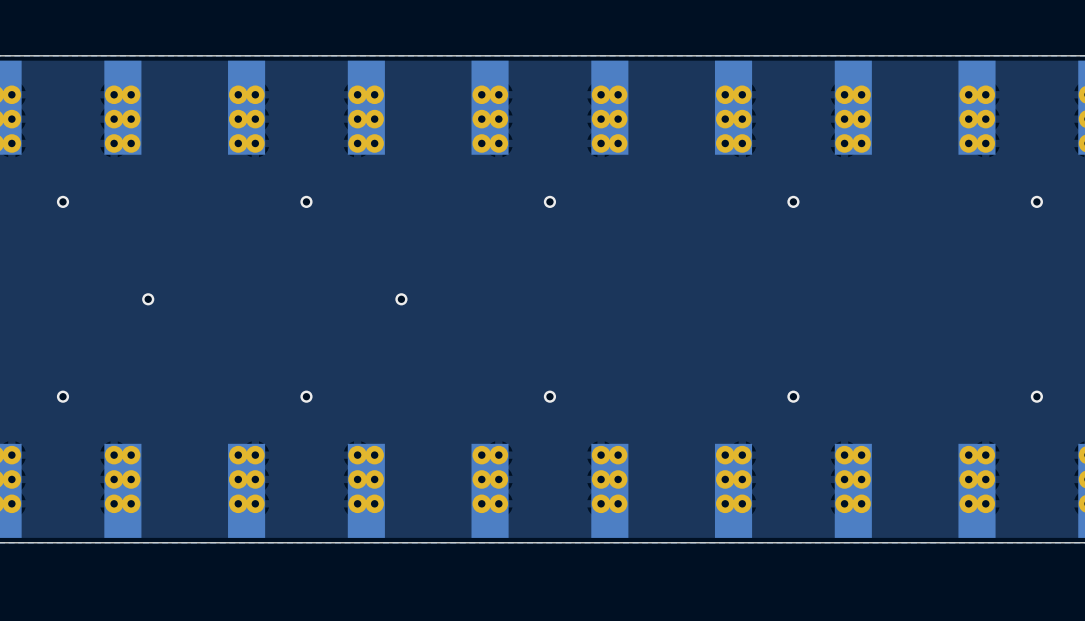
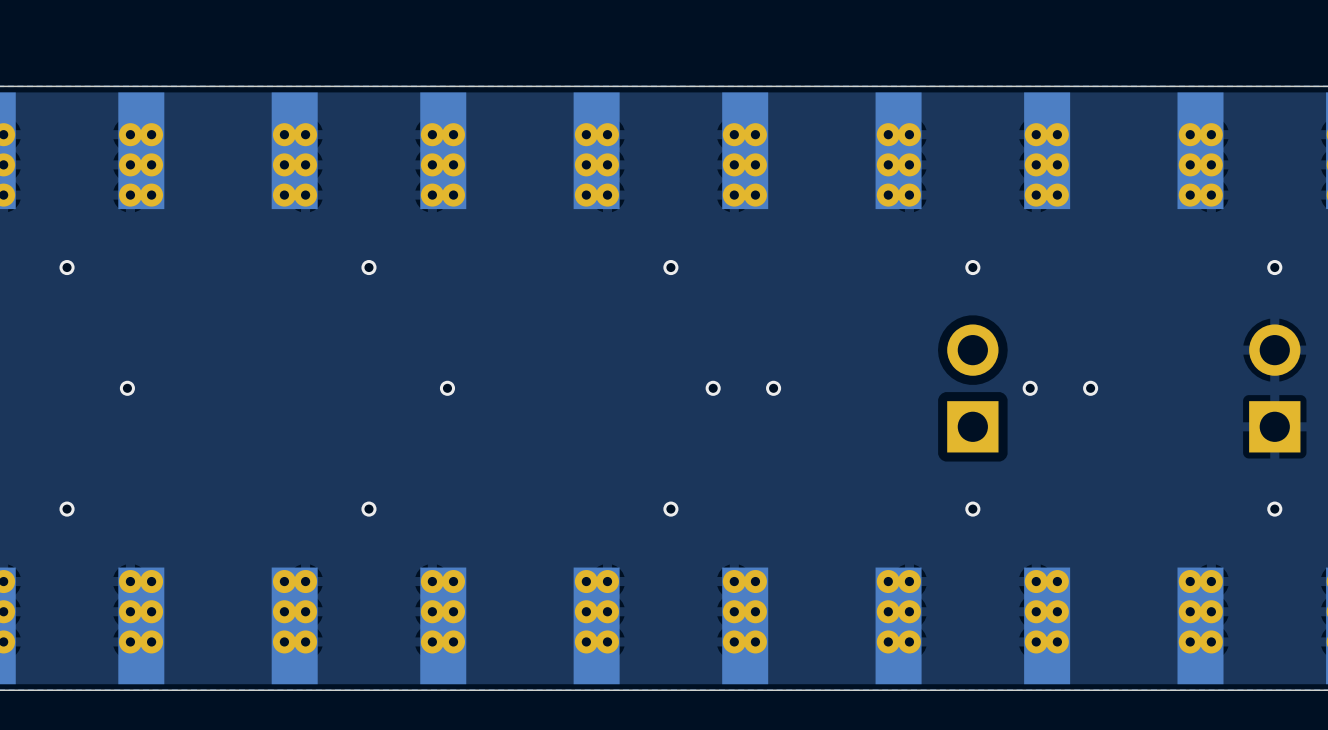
via position: (148, 299) -> (127, 388)
via position: (401, 299) -> (447, 388)
via: none -> (713, 388)
via: none -> (773, 388)
part: none -> (972, 388)
via: none -> (1030, 388)
via: none -> (1090, 388)
part: none -> (1274, 388)

